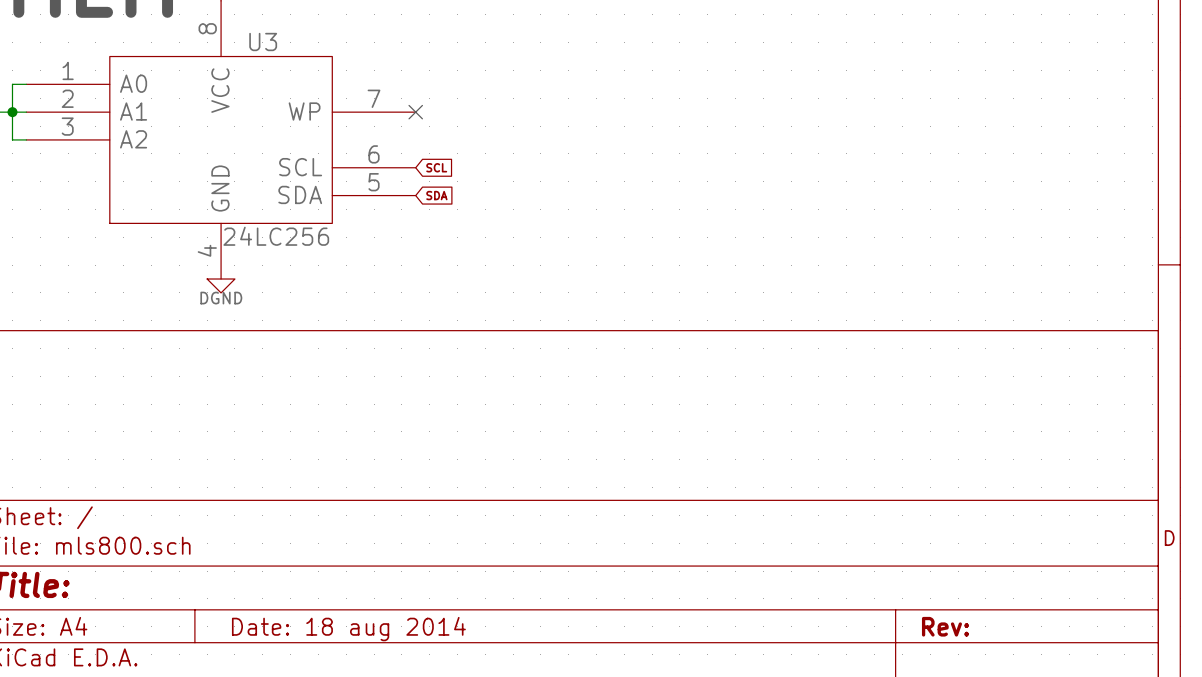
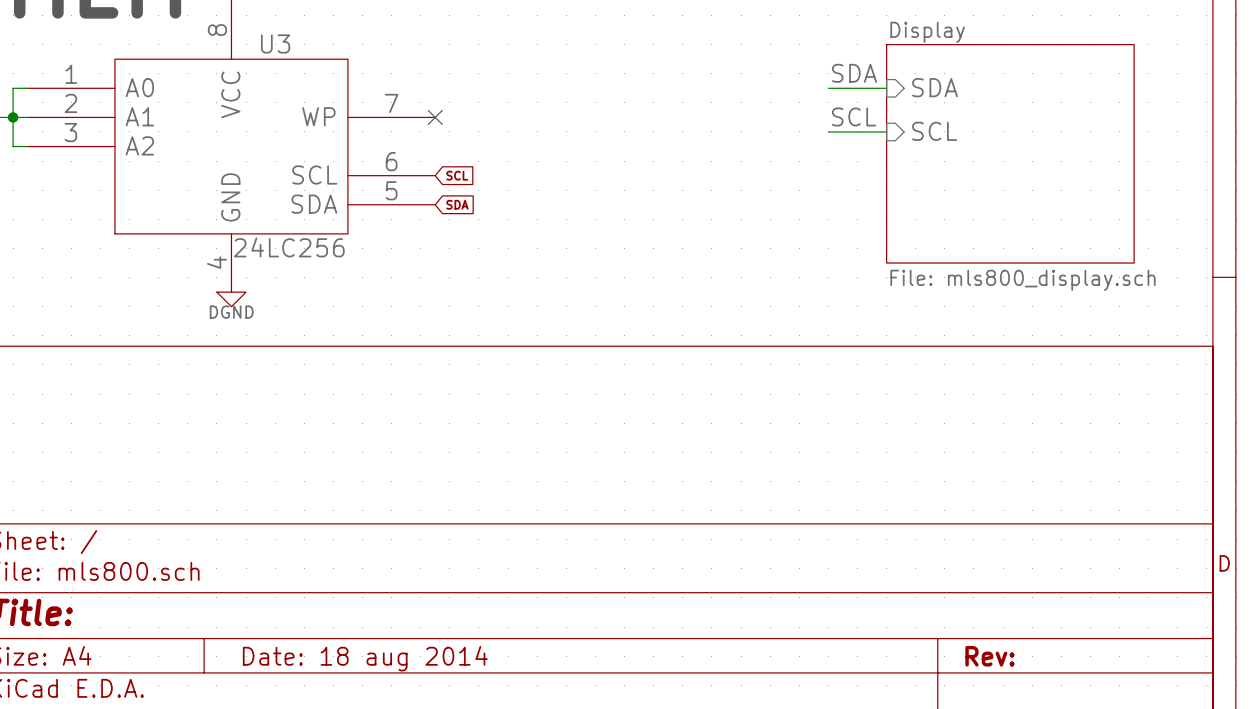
label: none -> SDA (854, 73)
sheet pin: none -> SDA (934, 87)
wire: none -> (828, 88) (886, 88)
label: none -> SCL (854, 116)
sheet pin: none -> SCL (934, 131)
wire: none -> (828, 131) (886, 131)
sheet Display: none -> File: mls800_display.sch (1010, 153)

